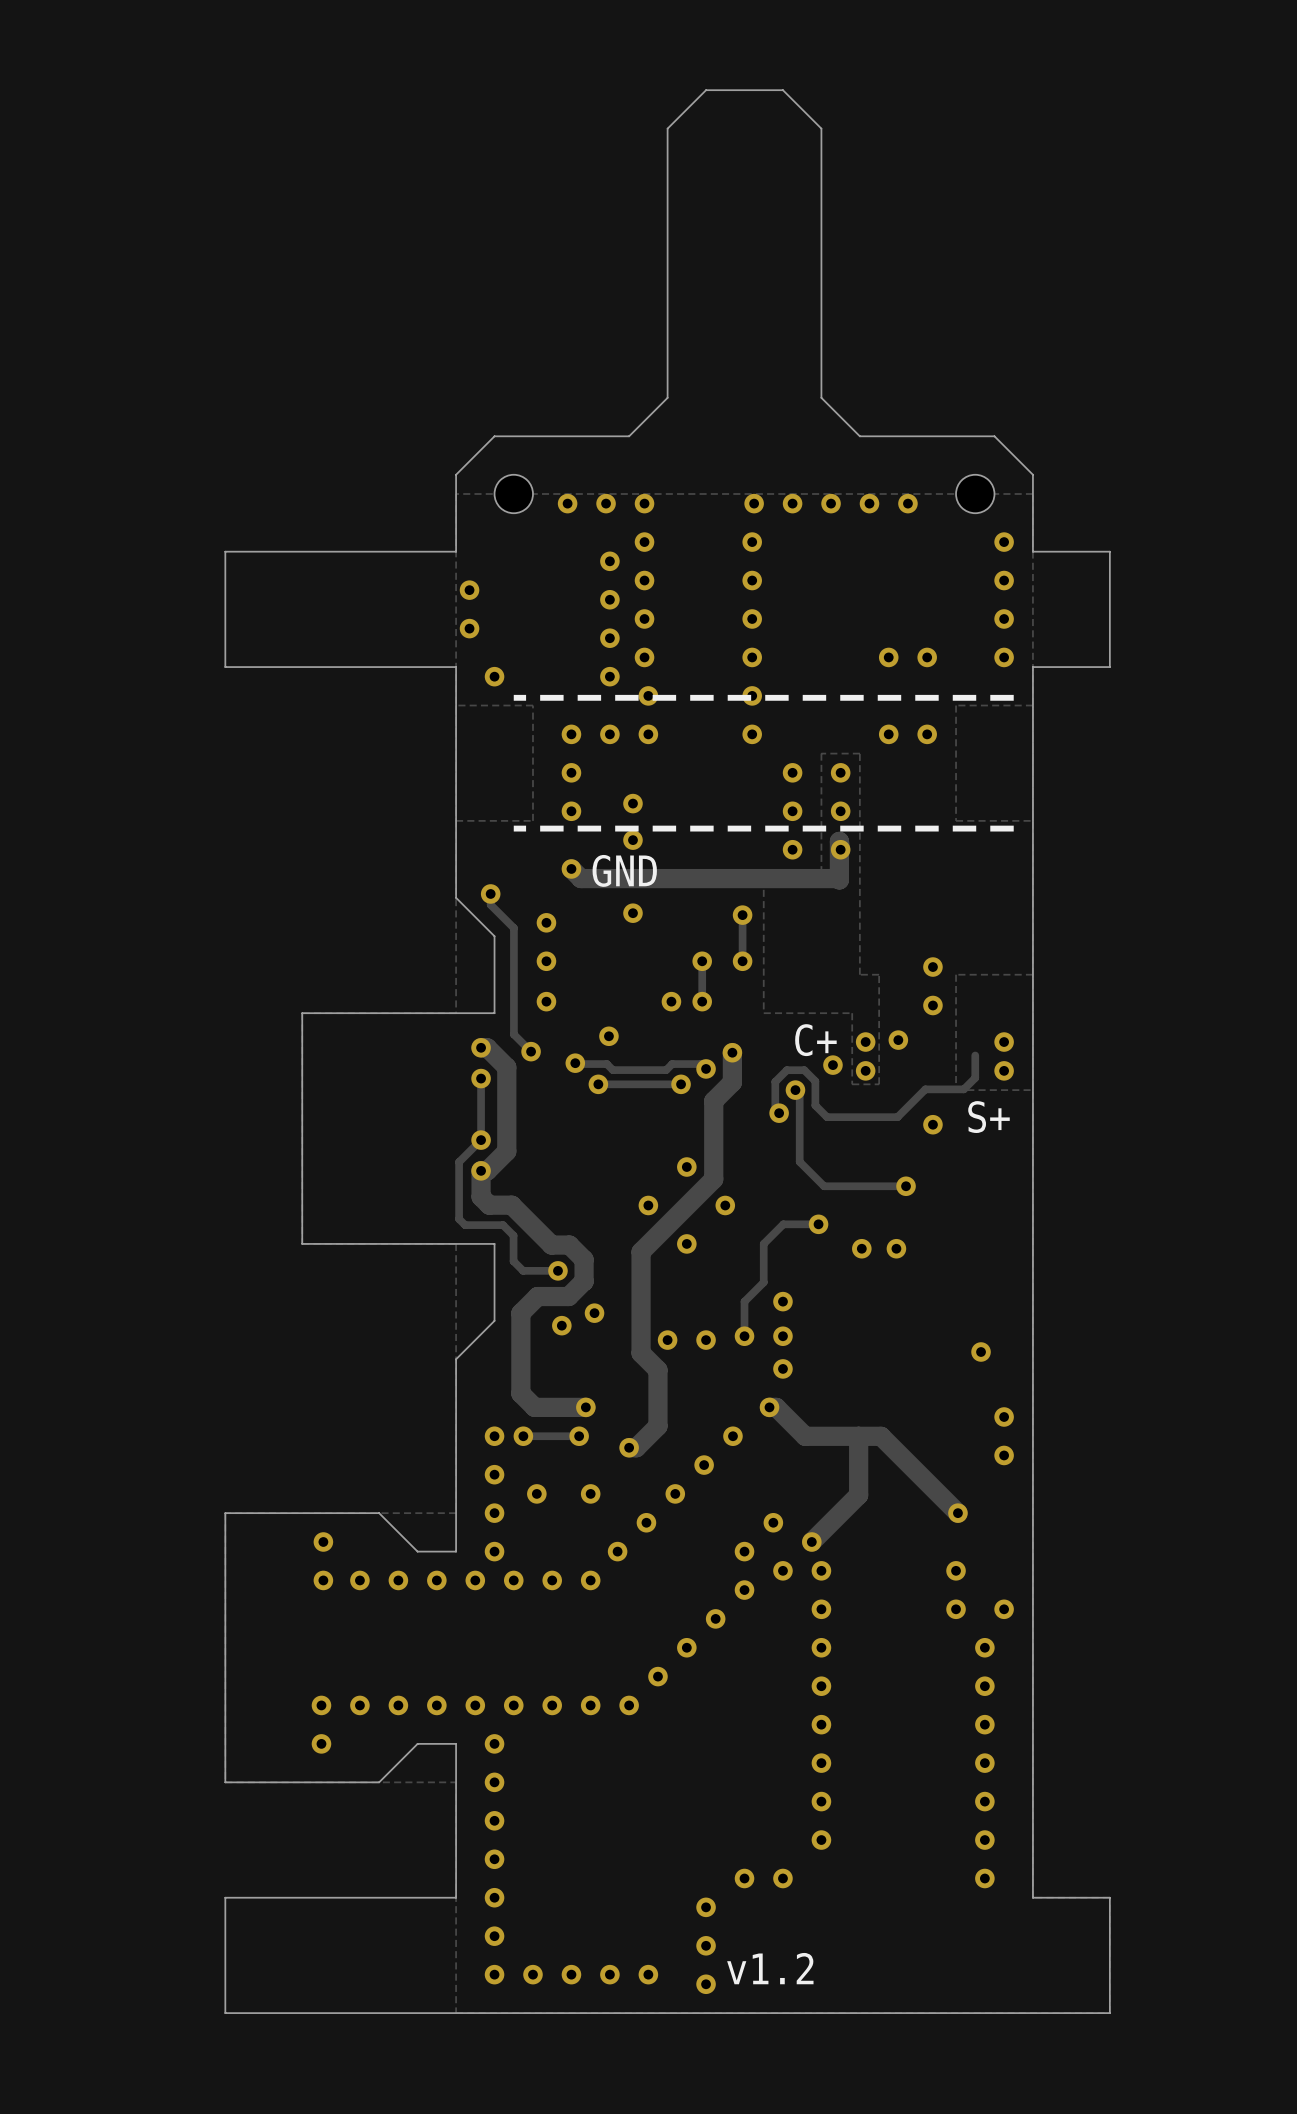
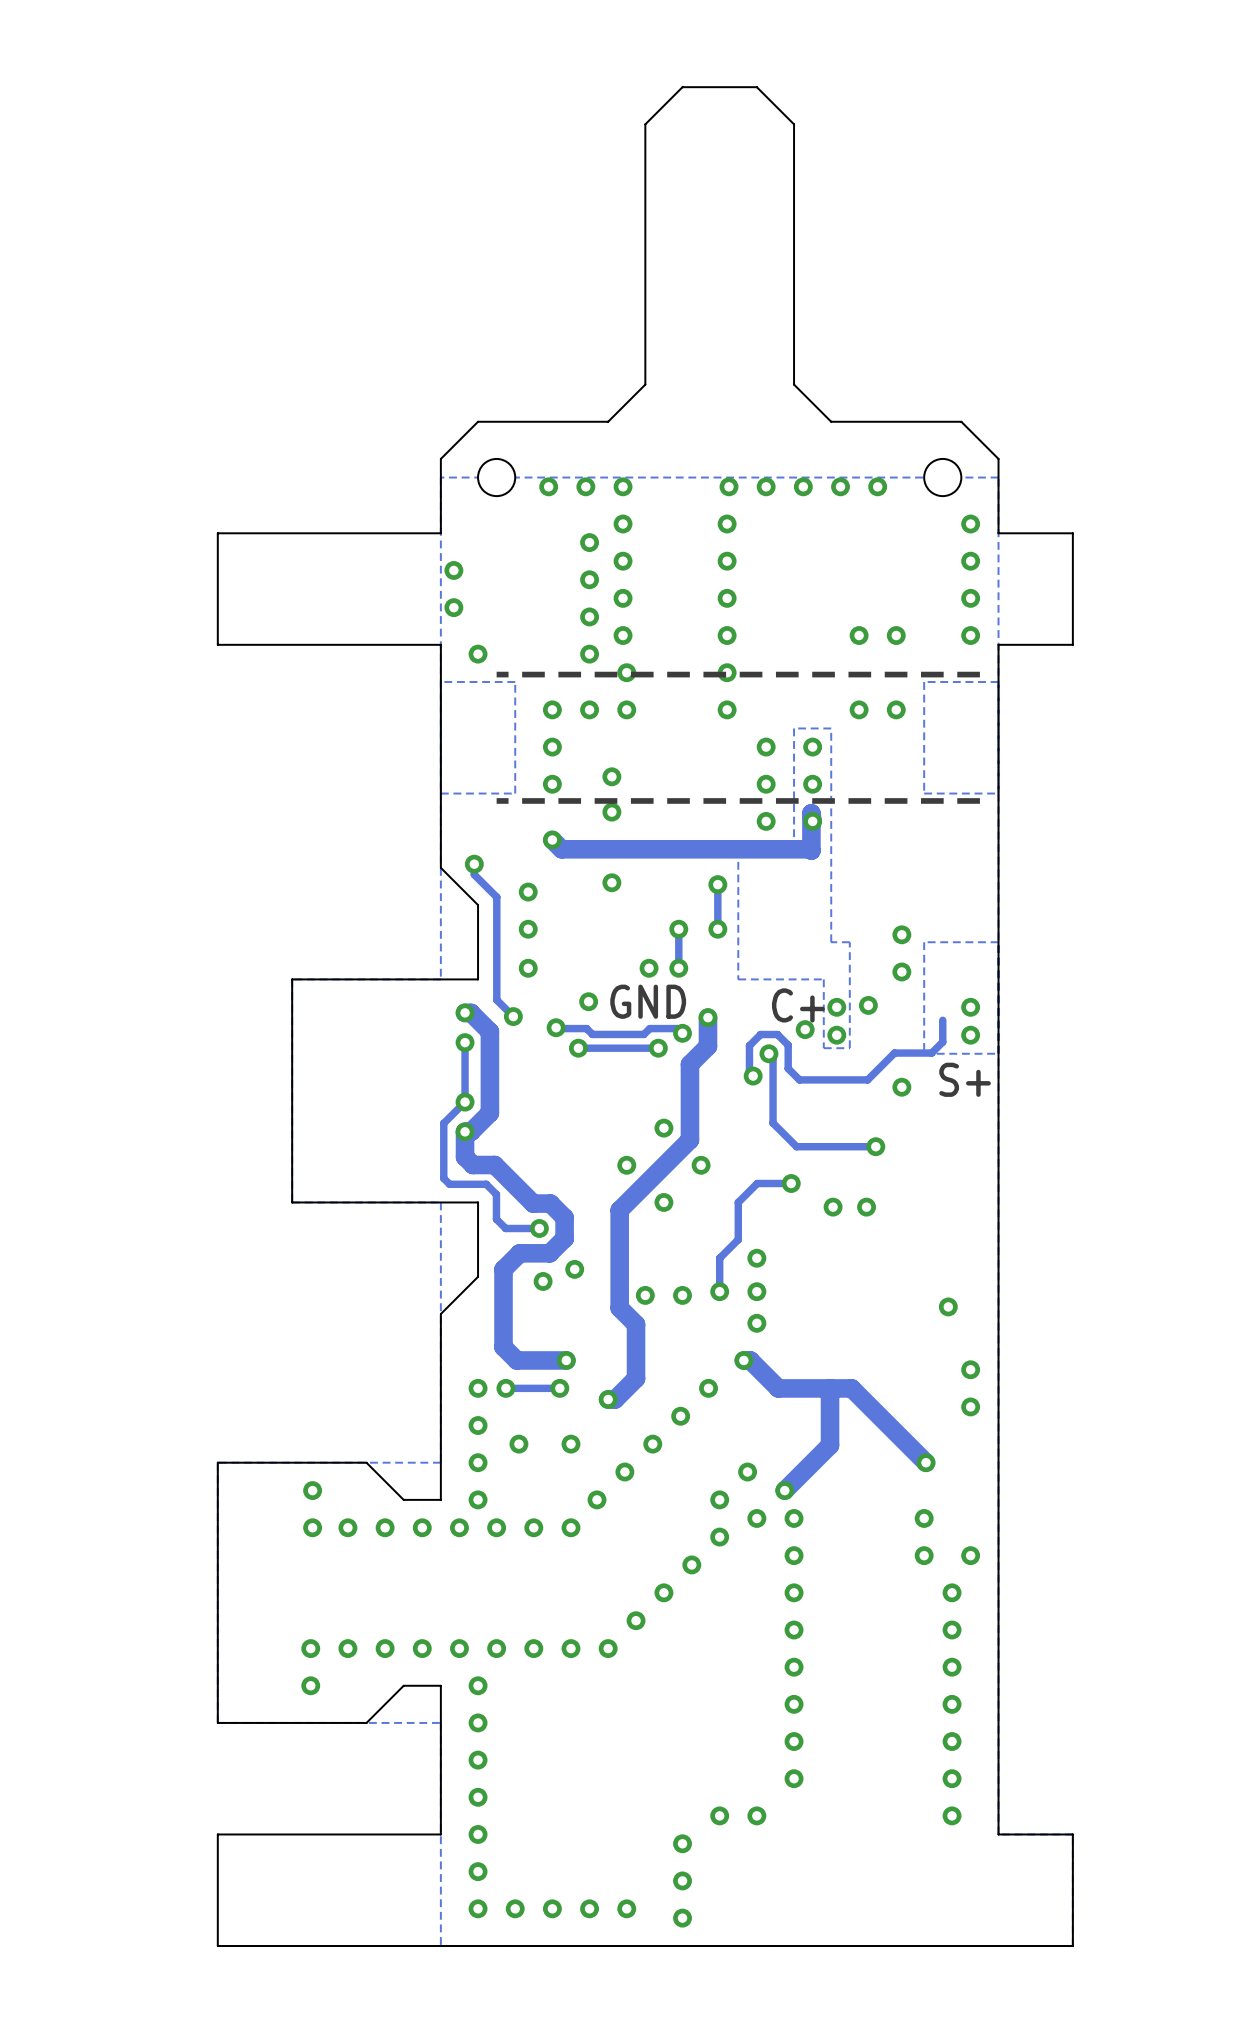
text position: GND (624, 870) -> GND (648, 1001)
text: v1.2 (770, 1968) -> none

